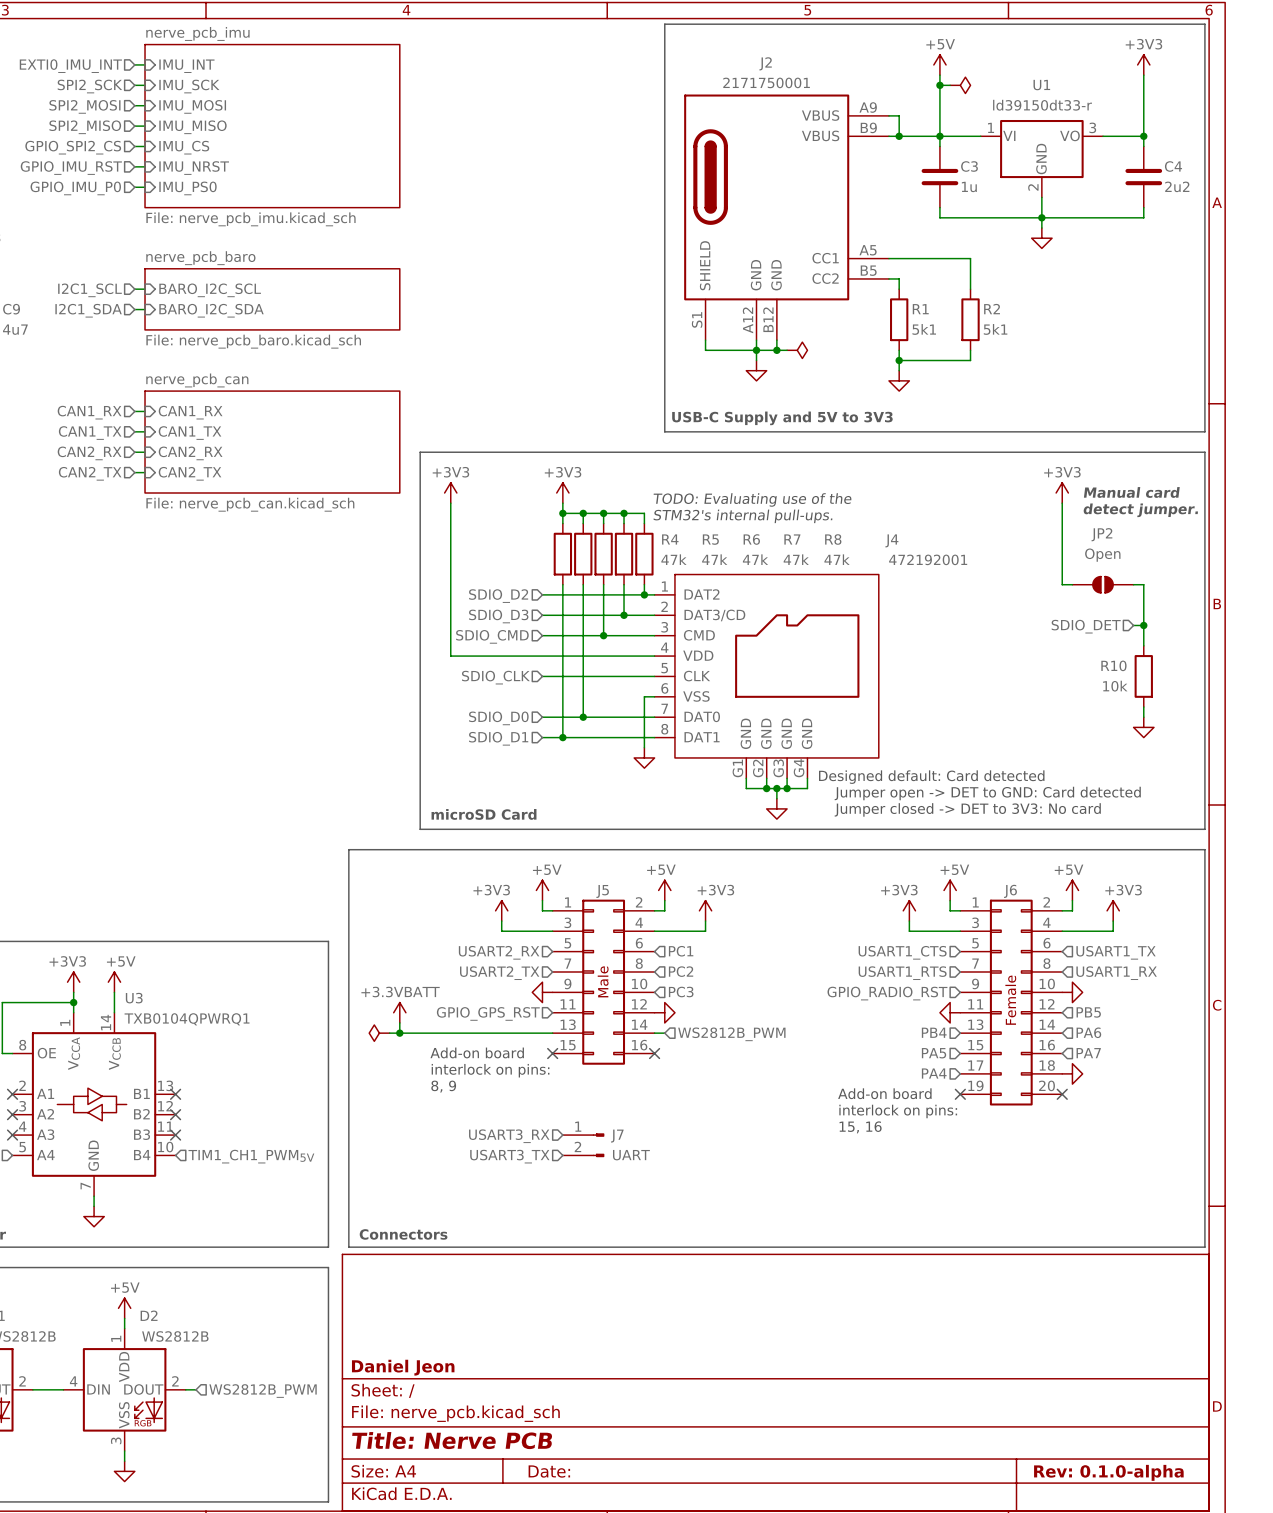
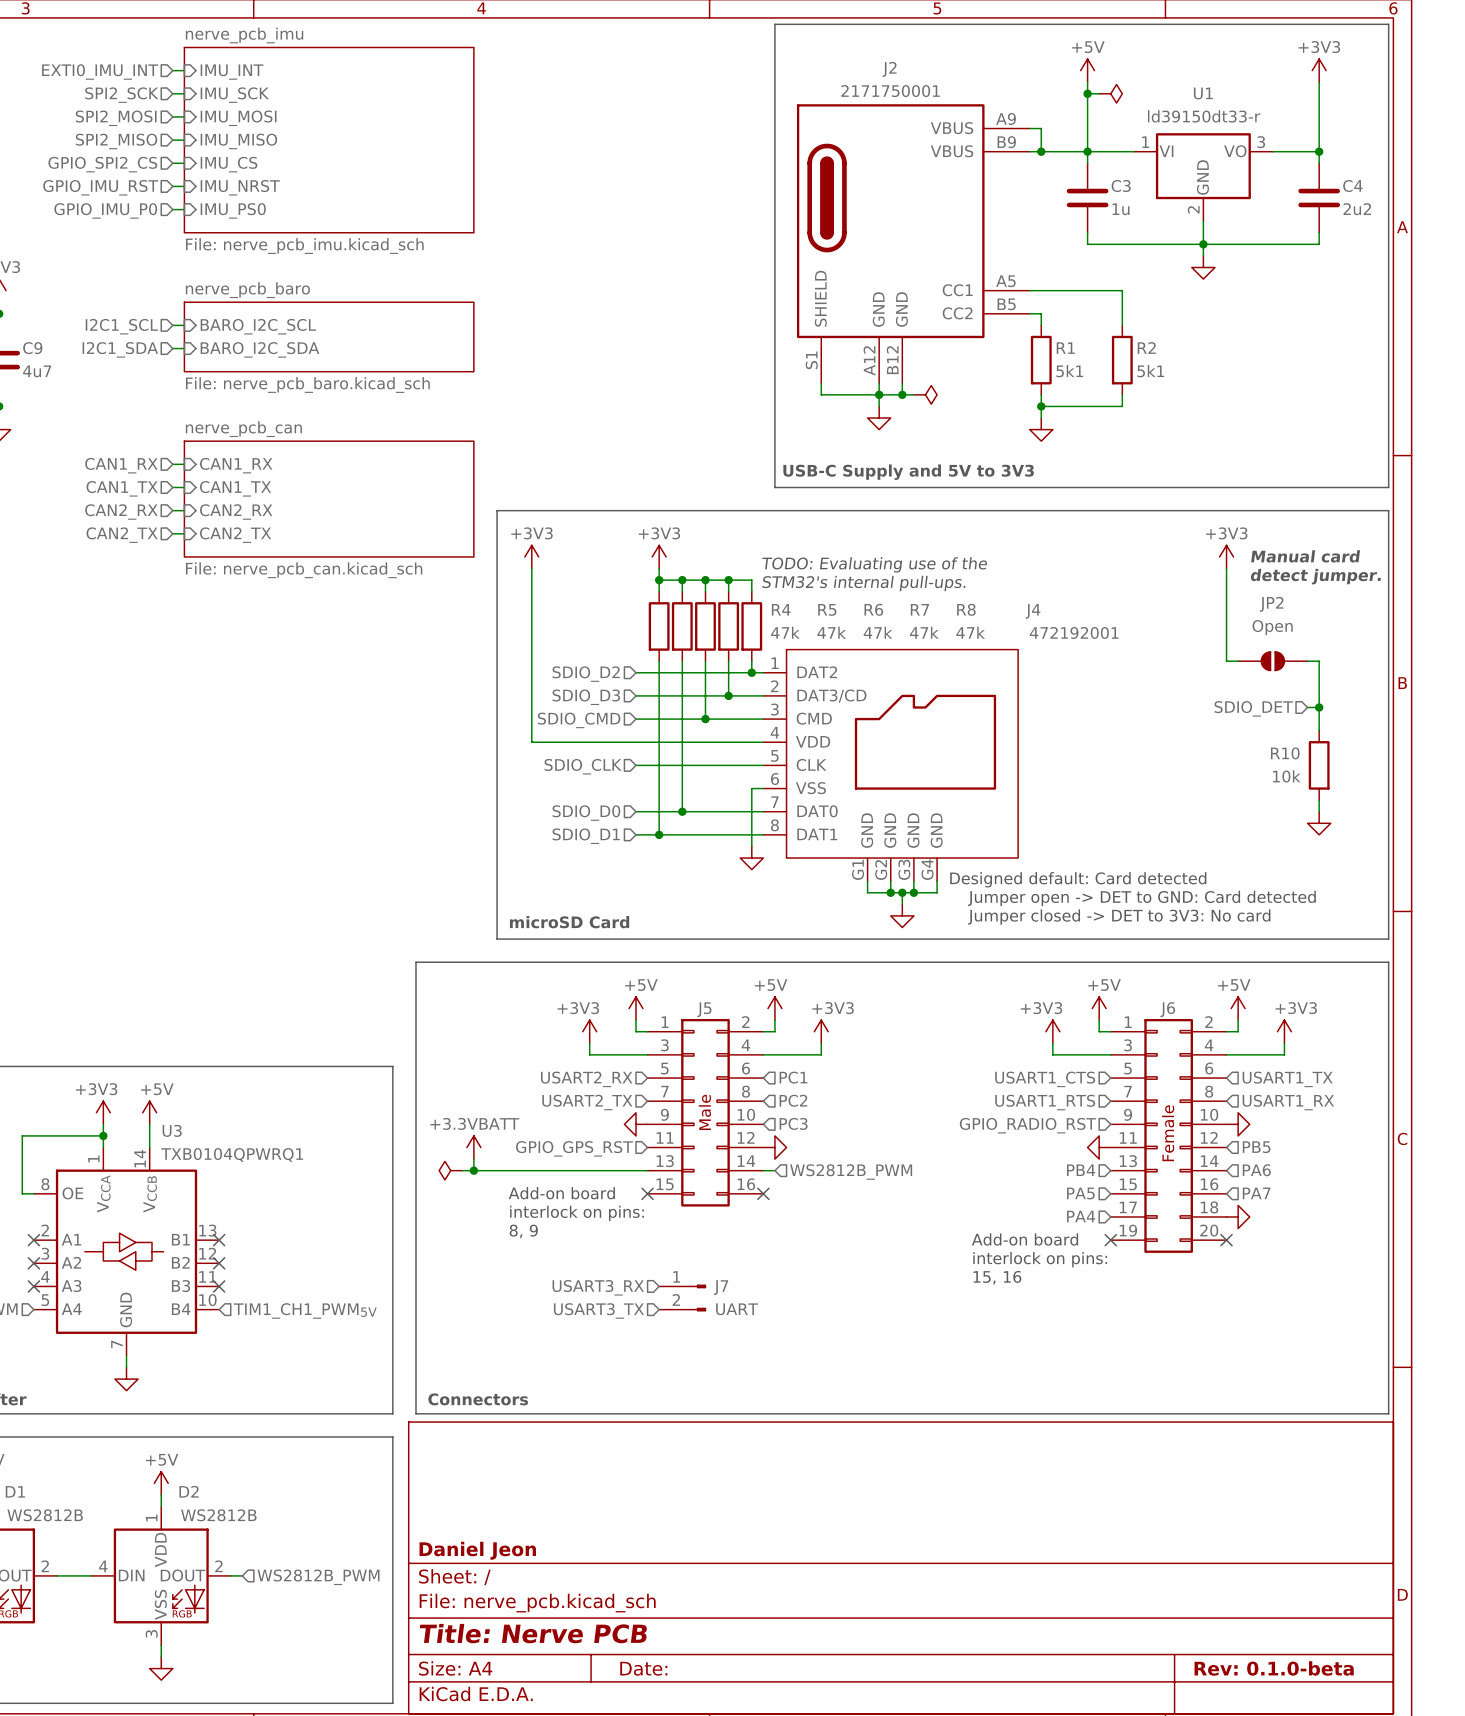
title block: Rev: 0.1.0-alpha (1108, 1472) -> Rev: 0.1.0-beta (1274, 1668)

